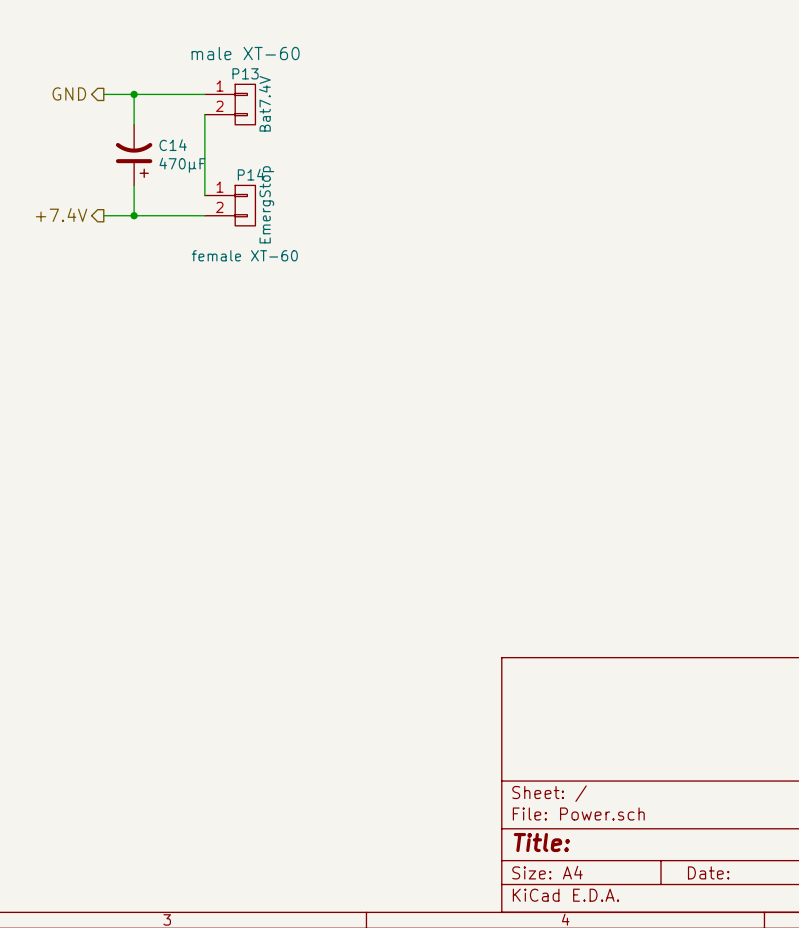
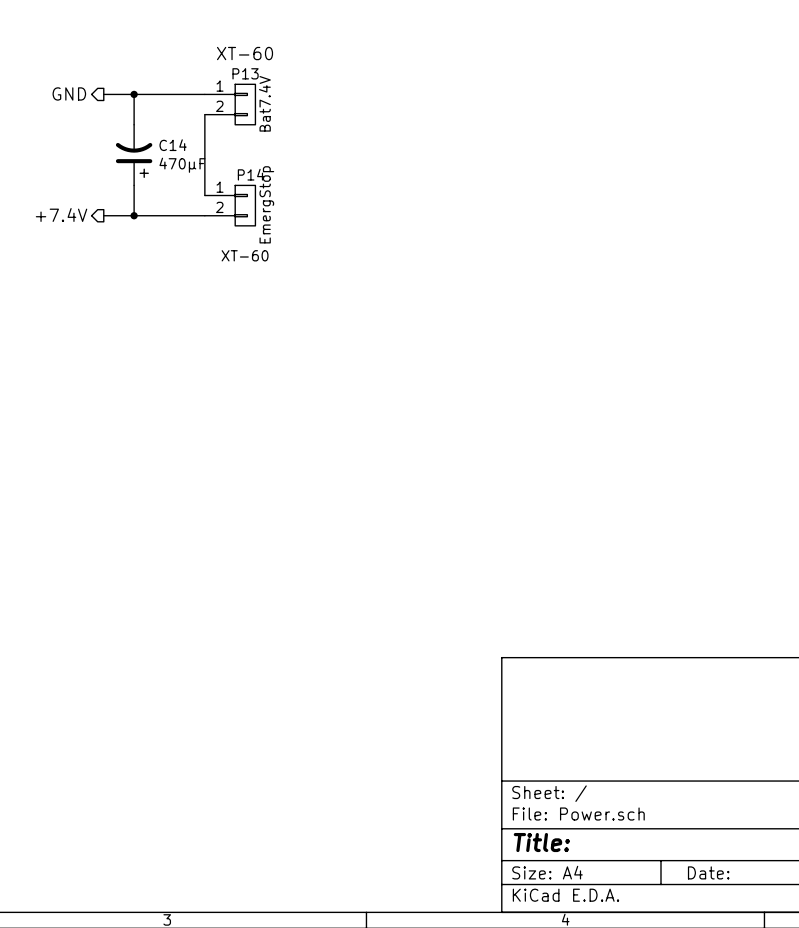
P13 text: male XT-60 (245, 53) -> XT-60 (245, 53)
P14 text: female XT-60 (244, 255) -> XT-60 (245, 255)

